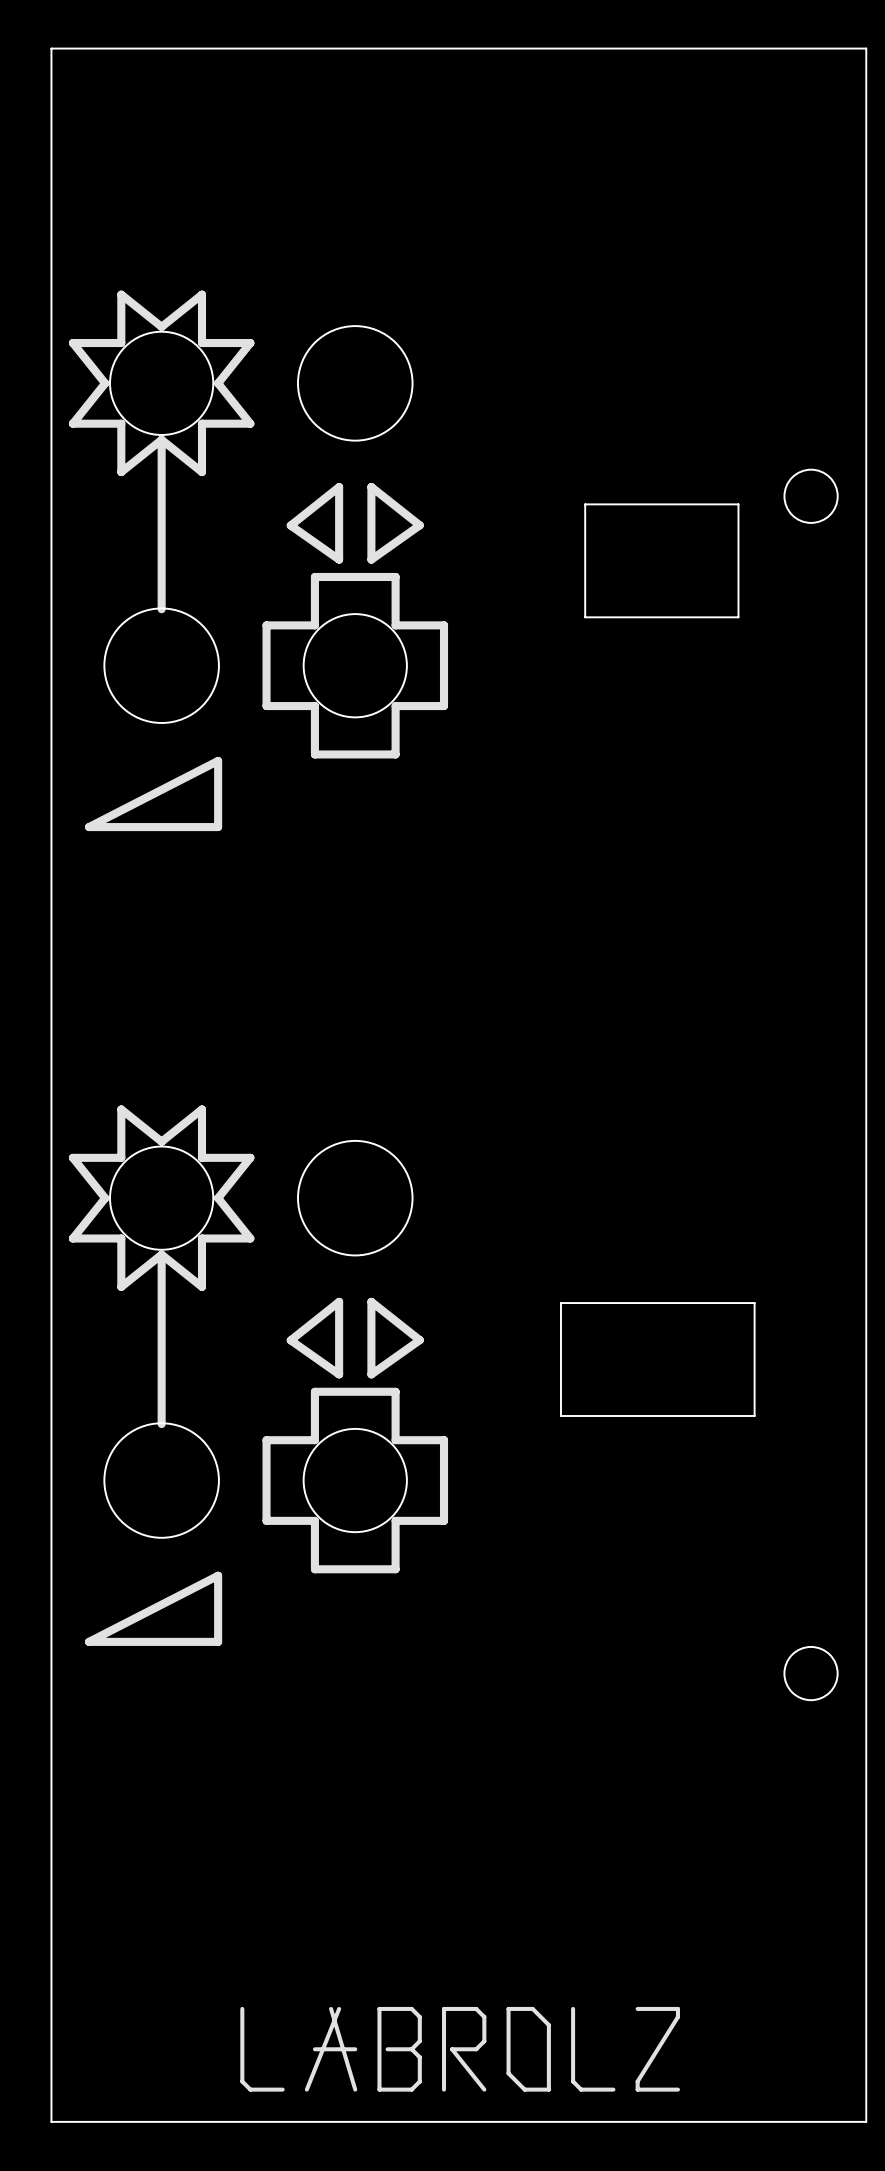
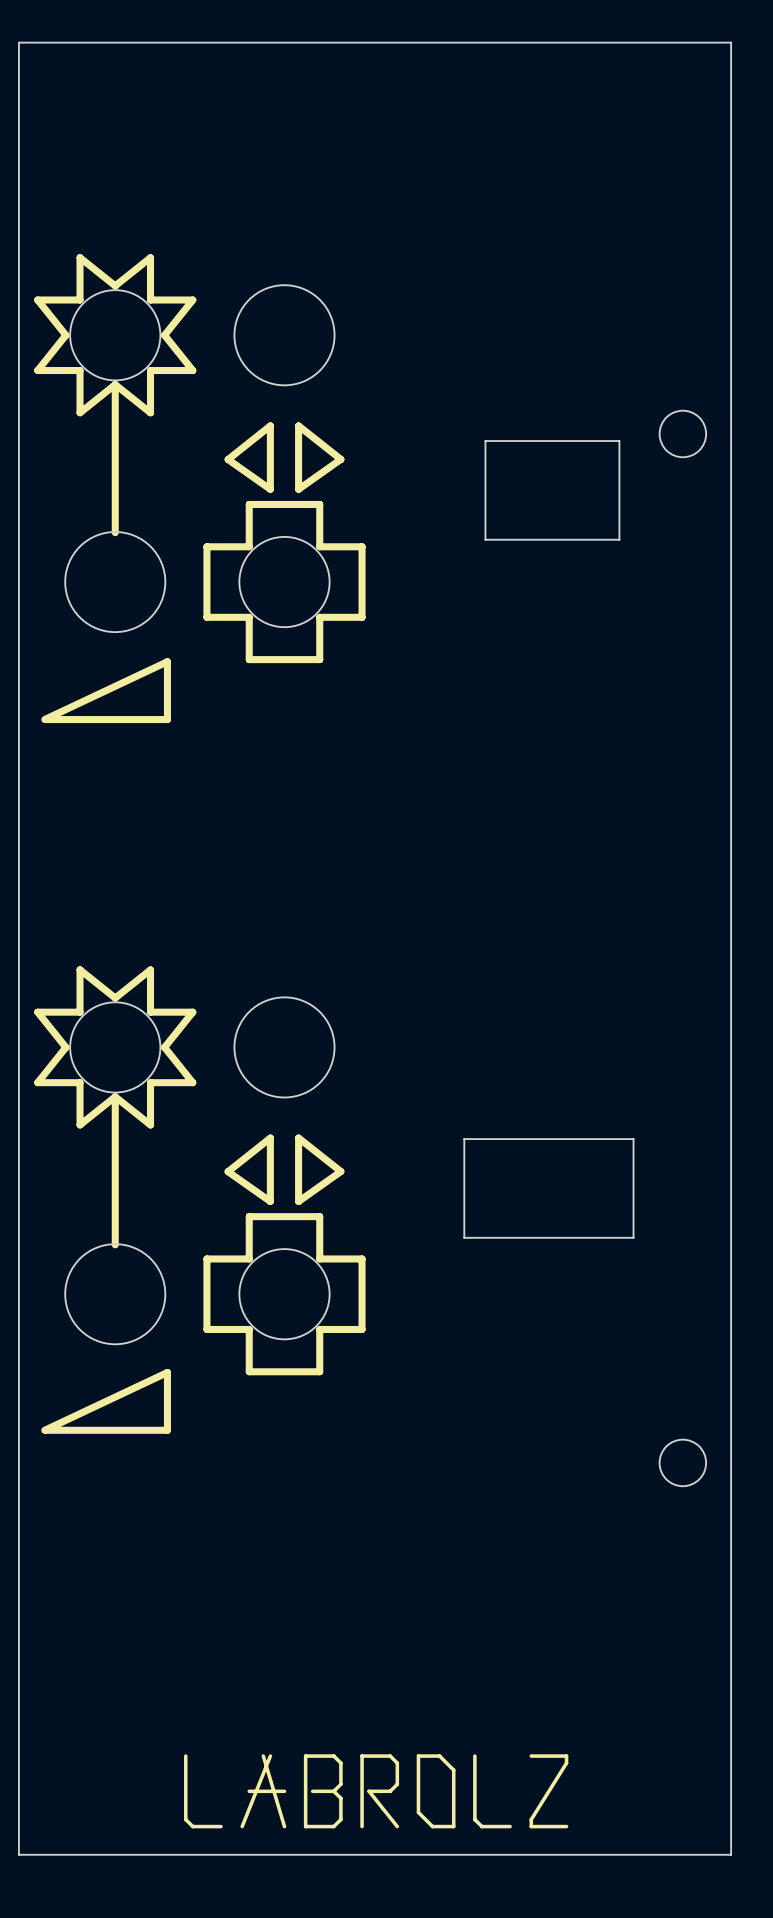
drawing shape: [85, 756, 223, 832] -> [41, 658, 171, 724]
drawing shape: [85, 1571, 223, 1646] -> [41, 1368, 171, 1434]

